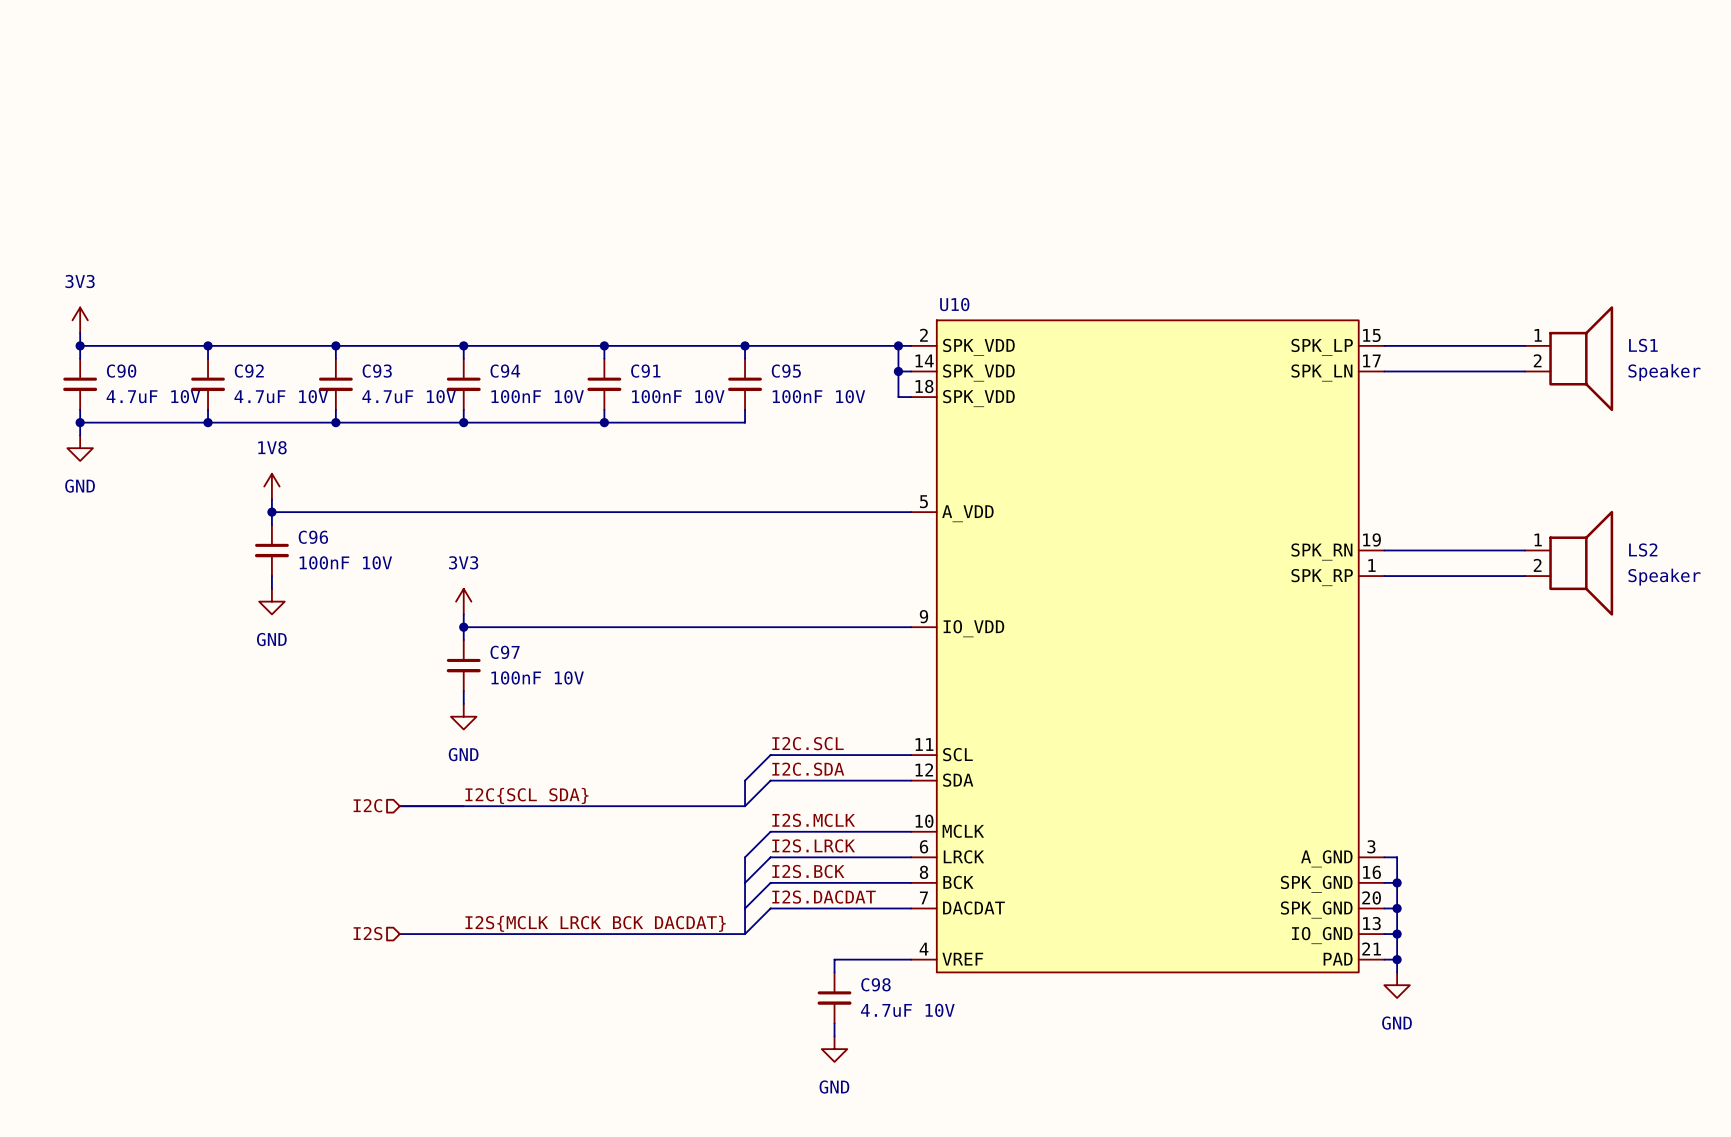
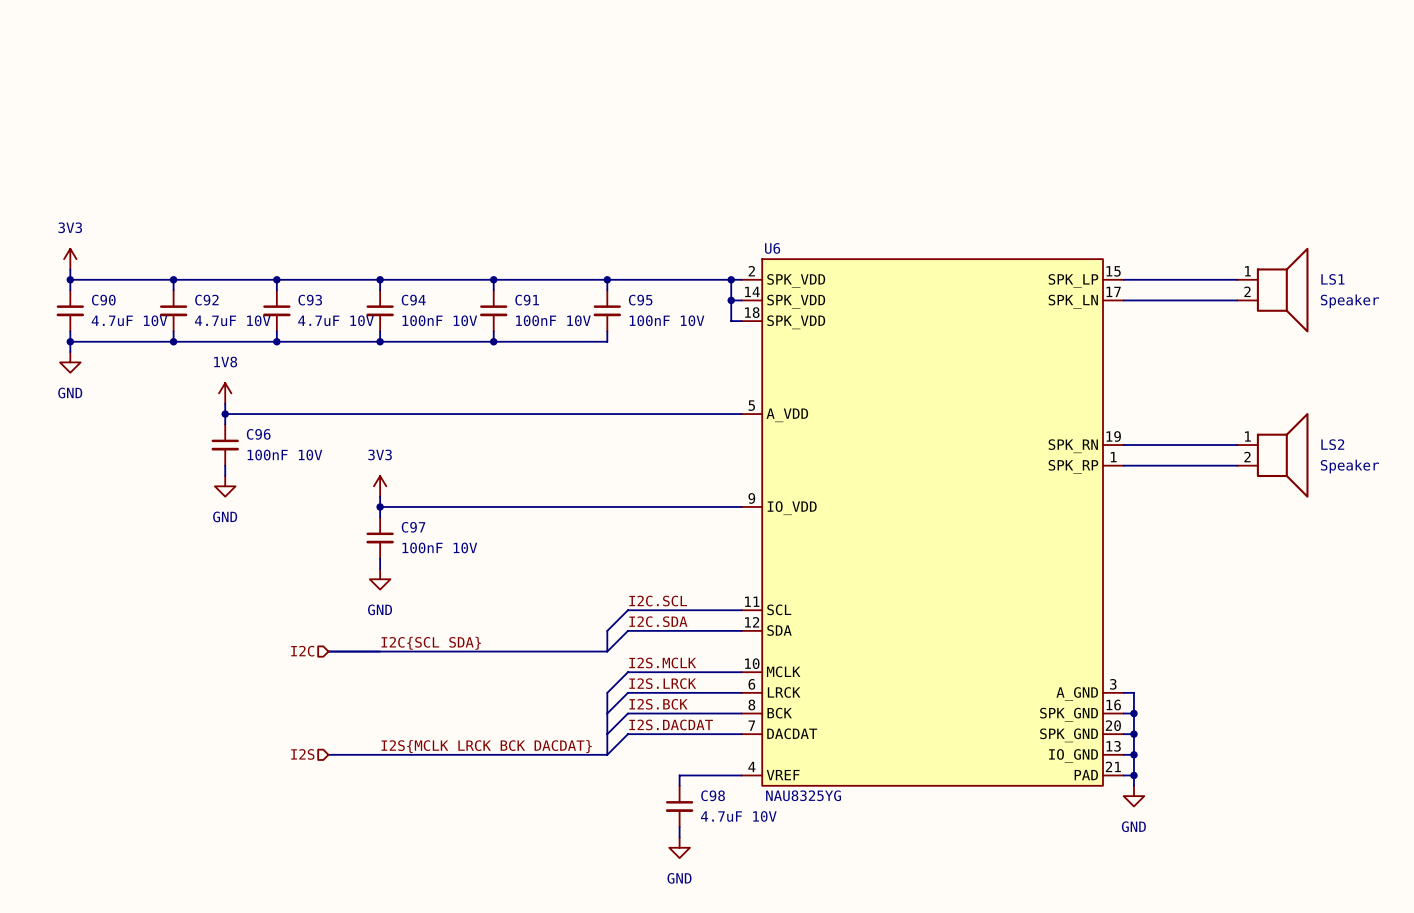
U10 name: U10 (954, 304) -> U6 (772, 248)
U10 value: none -> NAU8325YG (803, 795)

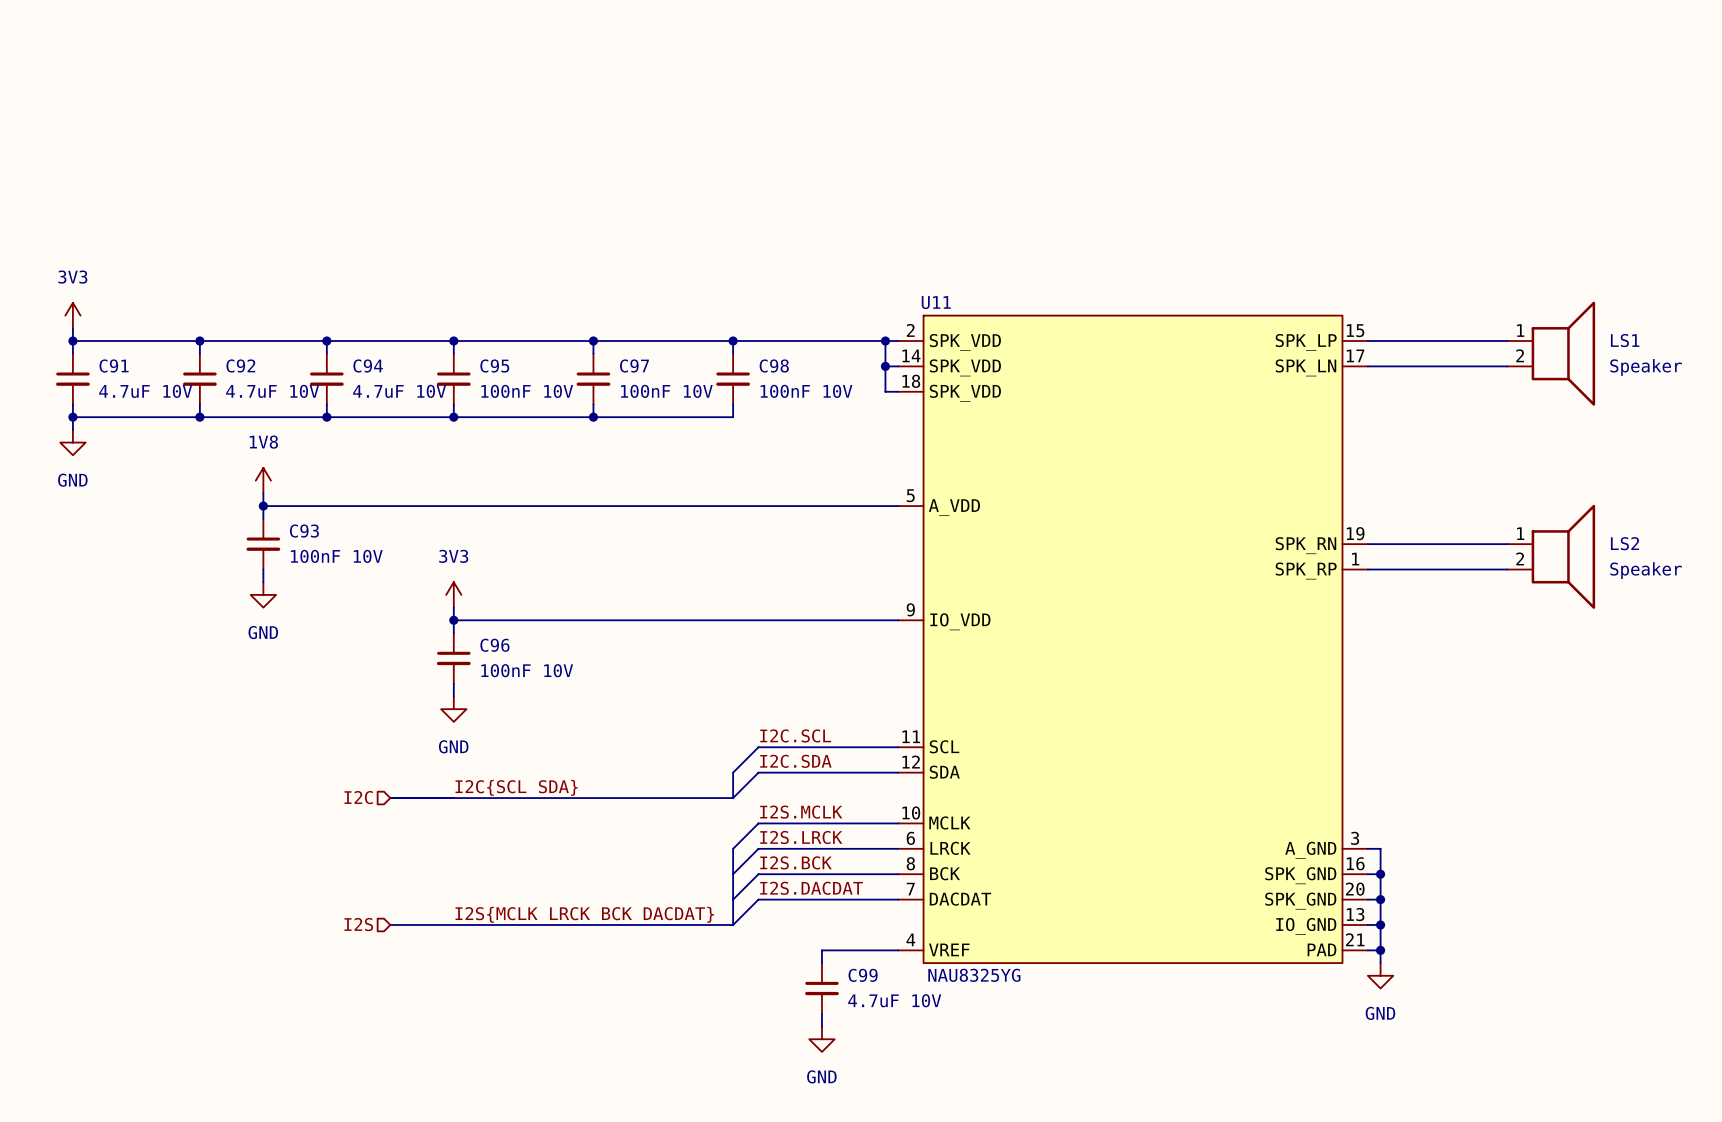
U6 name: U6 (772, 248) -> U11 (936, 302)
C90 name: C90 (103, 300) -> C91 (114, 365)
C93 name: C93 (310, 300) -> C94 (368, 365)
C94 name: C94 (413, 300) -> C95 (494, 365)
C91 name: C91 (527, 300) -> C97 (634, 365)
C95 name: C95 (640, 300) -> C98 (774, 365)
C96 name: C96 (258, 434) -> C93 (304, 531)
C97 name: C97 (413, 527) -> C96 (494, 645)
C98 name: C98 (713, 795) -> C99 (863, 975)

